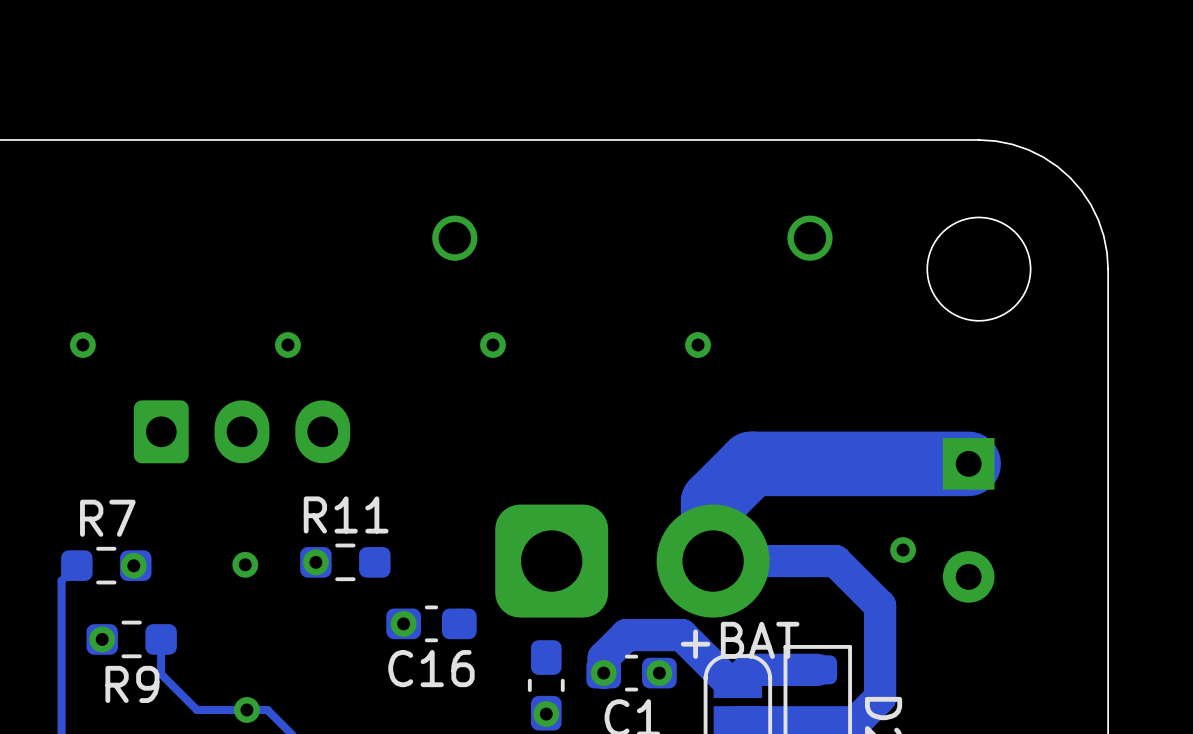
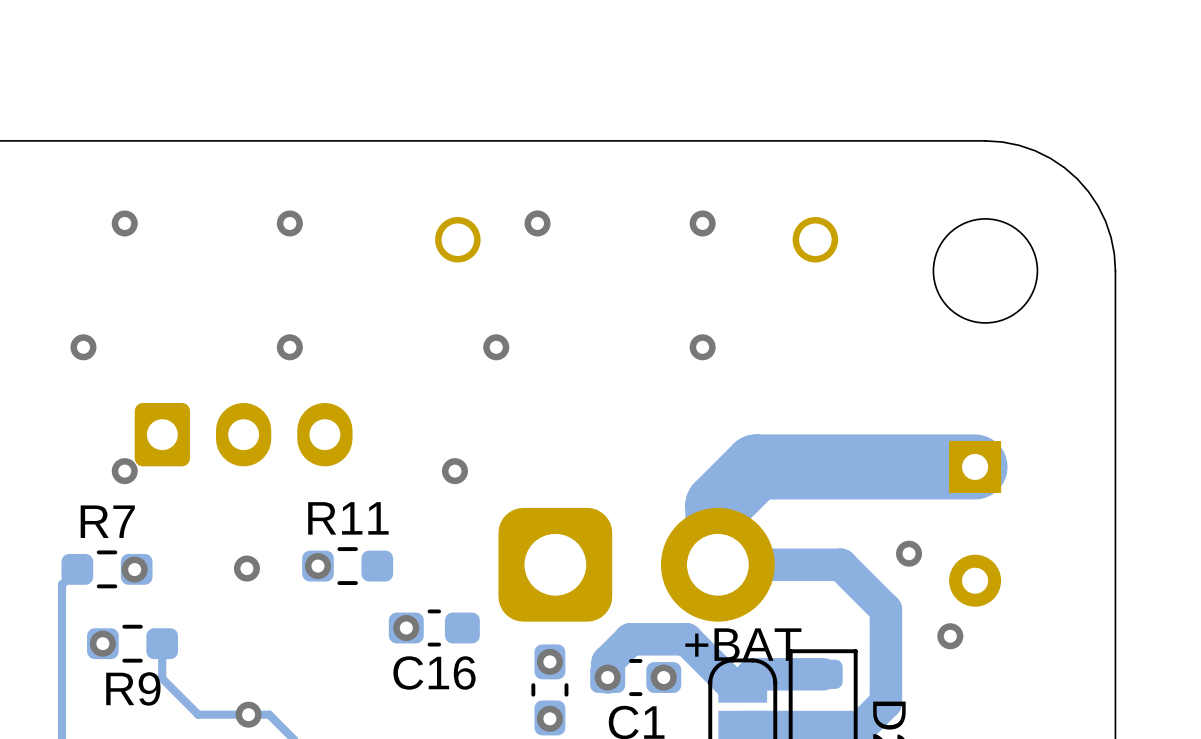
via: none -> (124, 223)
via: none -> (289, 223)
via: none -> (537, 223)
via: none -> (702, 223)
via: none -> (124, 471)
via: none -> (454, 471)
via: none -> (950, 636)
via: none -> (549, 661)

